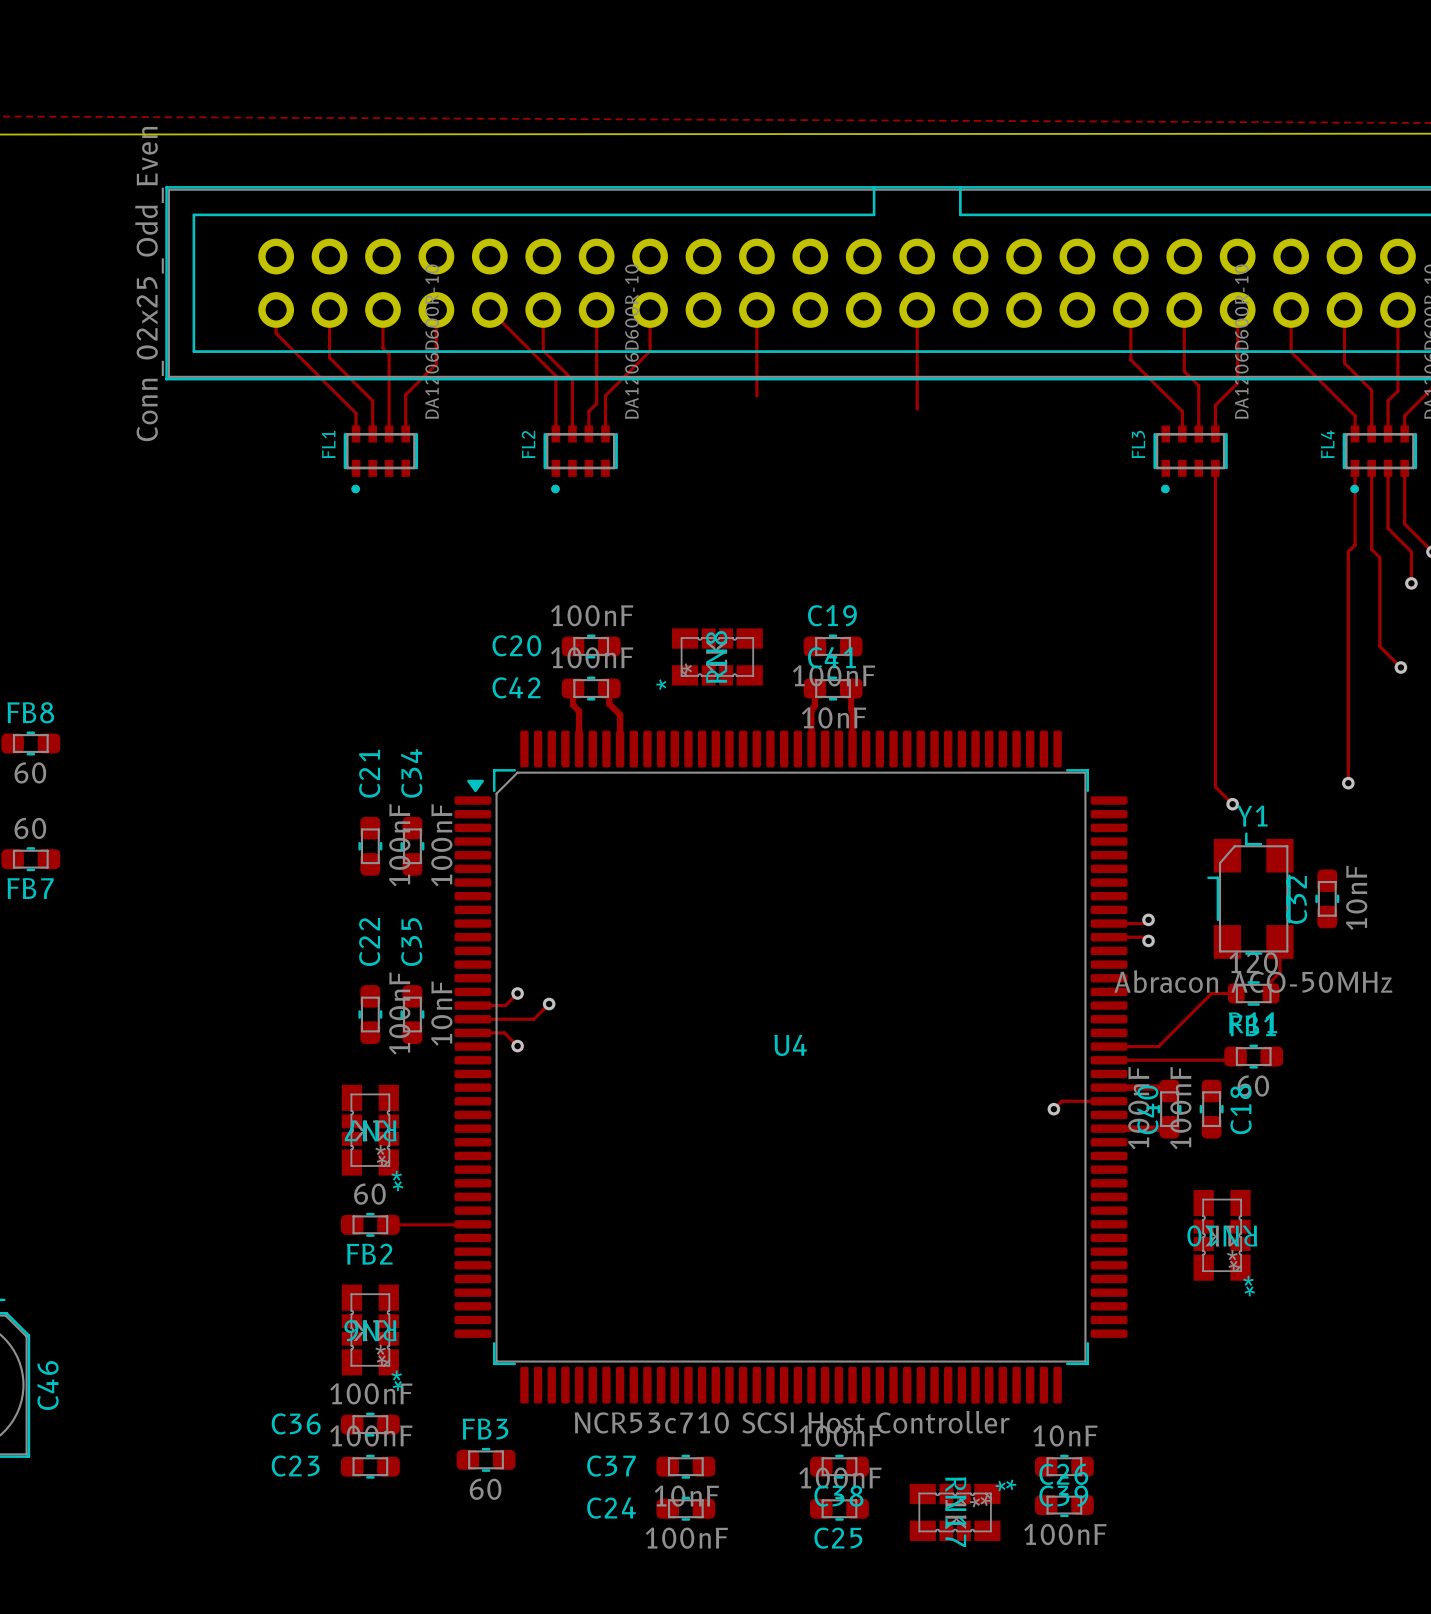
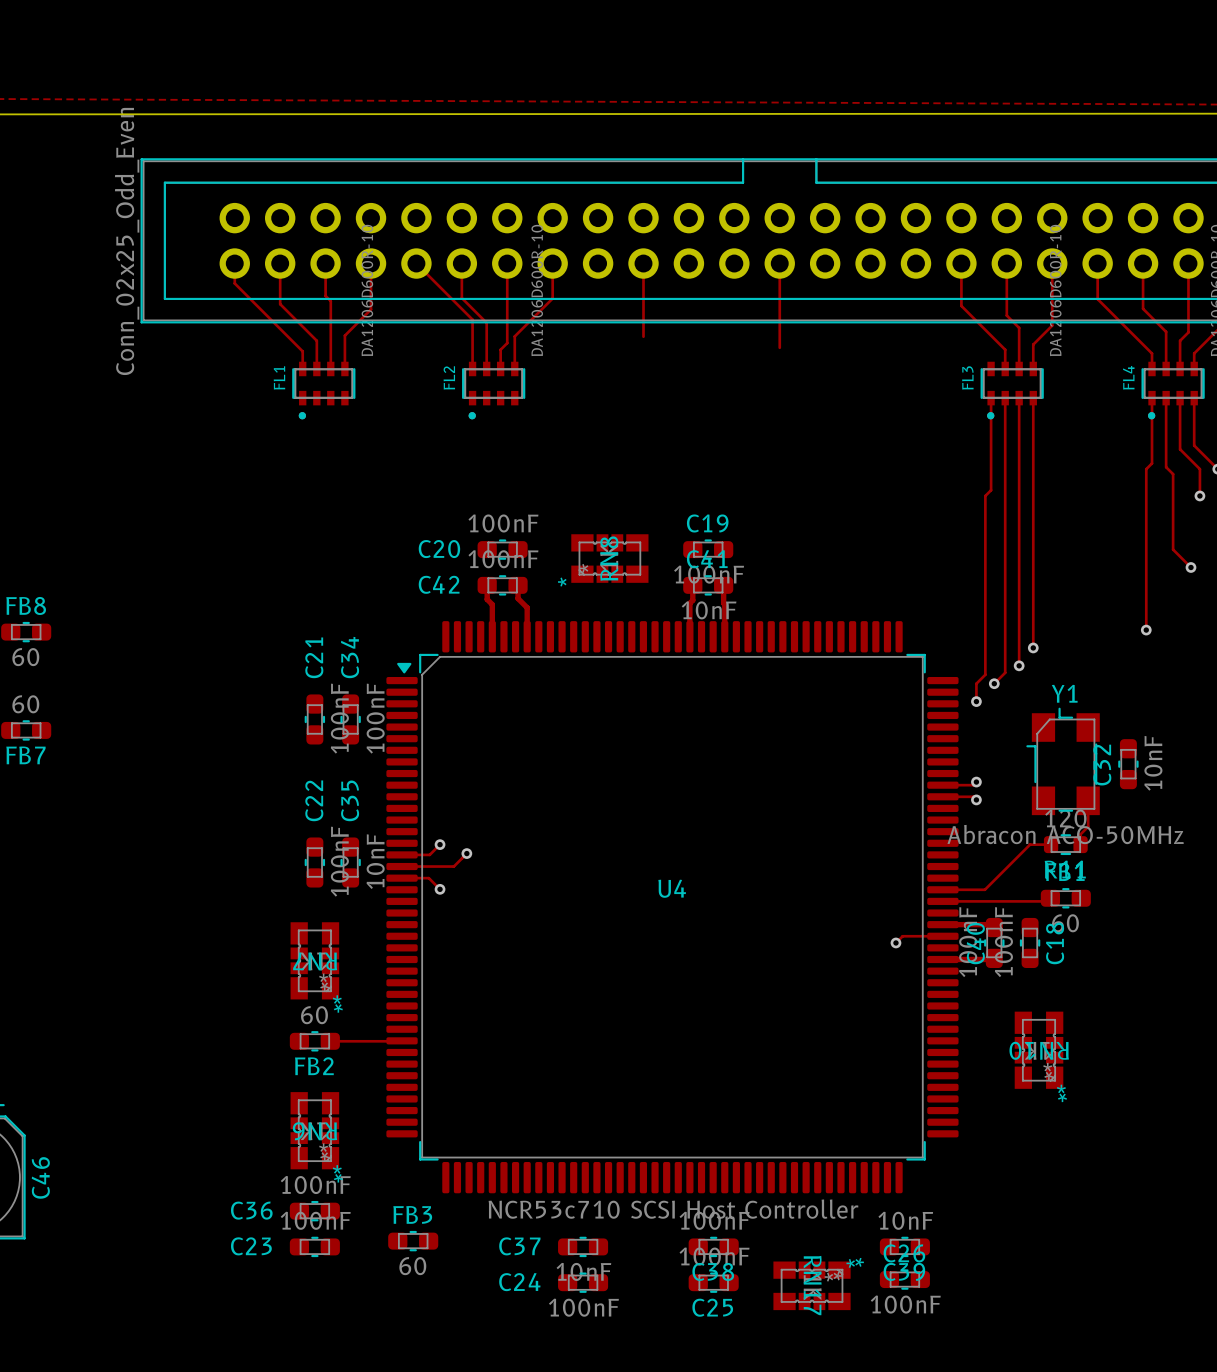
track: none -> (991, 398) (991, 490) (985, 495) (985, 674) (976, 683) (976, 701)
track: none -> (1005, 398) (1005, 672) (994, 683)
track: none -> (1019, 398) (1019, 665)
track: (1348, 741) (1348, 783) -> none
track: (1215, 762) (1215, 786) (1232, 804) -> none
via: none -> (1033, 647)
via: none -> (1019, 665)
via position: (1348, 783) -> (1146, 630)
via: none -> (994, 683)
via: (1232, 804) -> none
via: none -> (976, 701)

